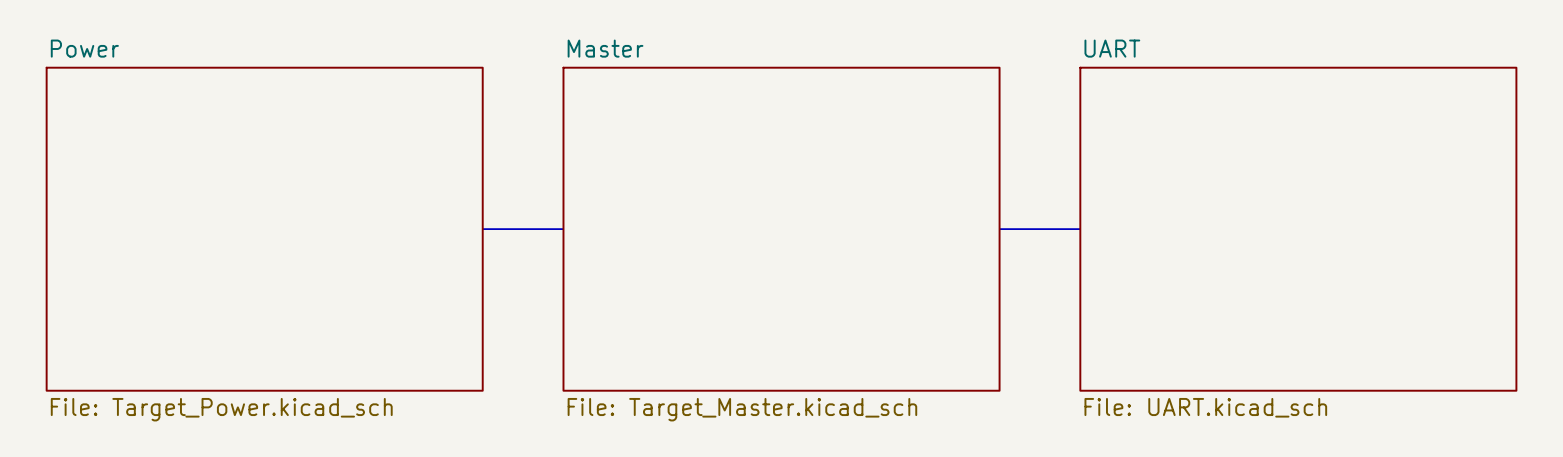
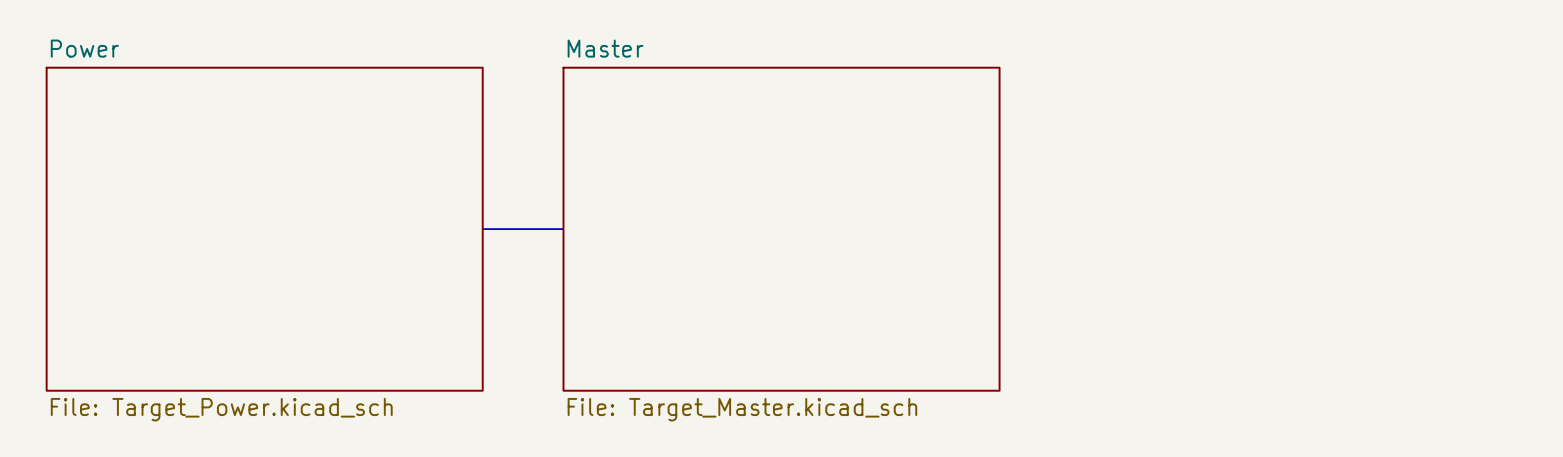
line: (999, 229) (1080, 229) -> none
sheet UART: File: UART.kicad_sch (1298, 229) -> none

